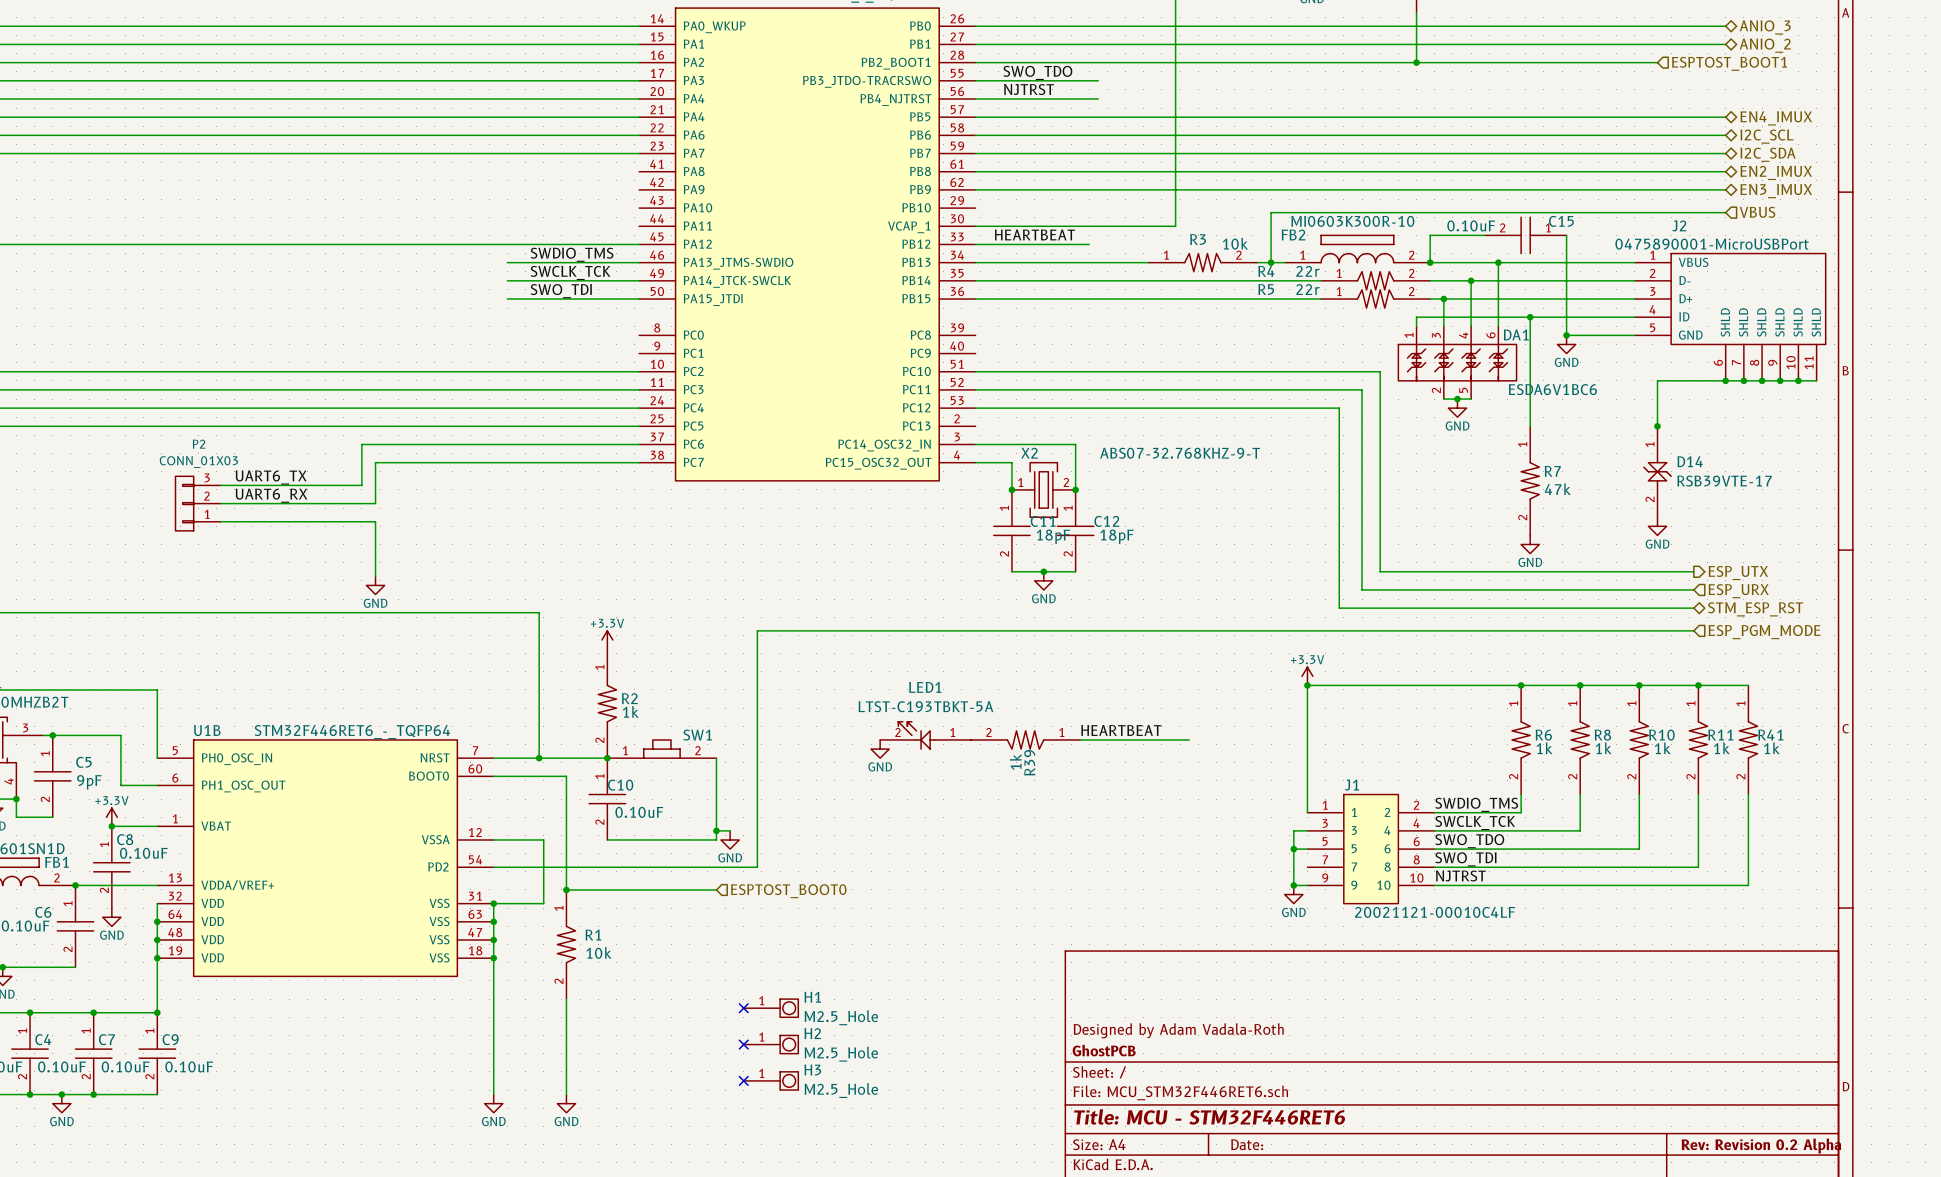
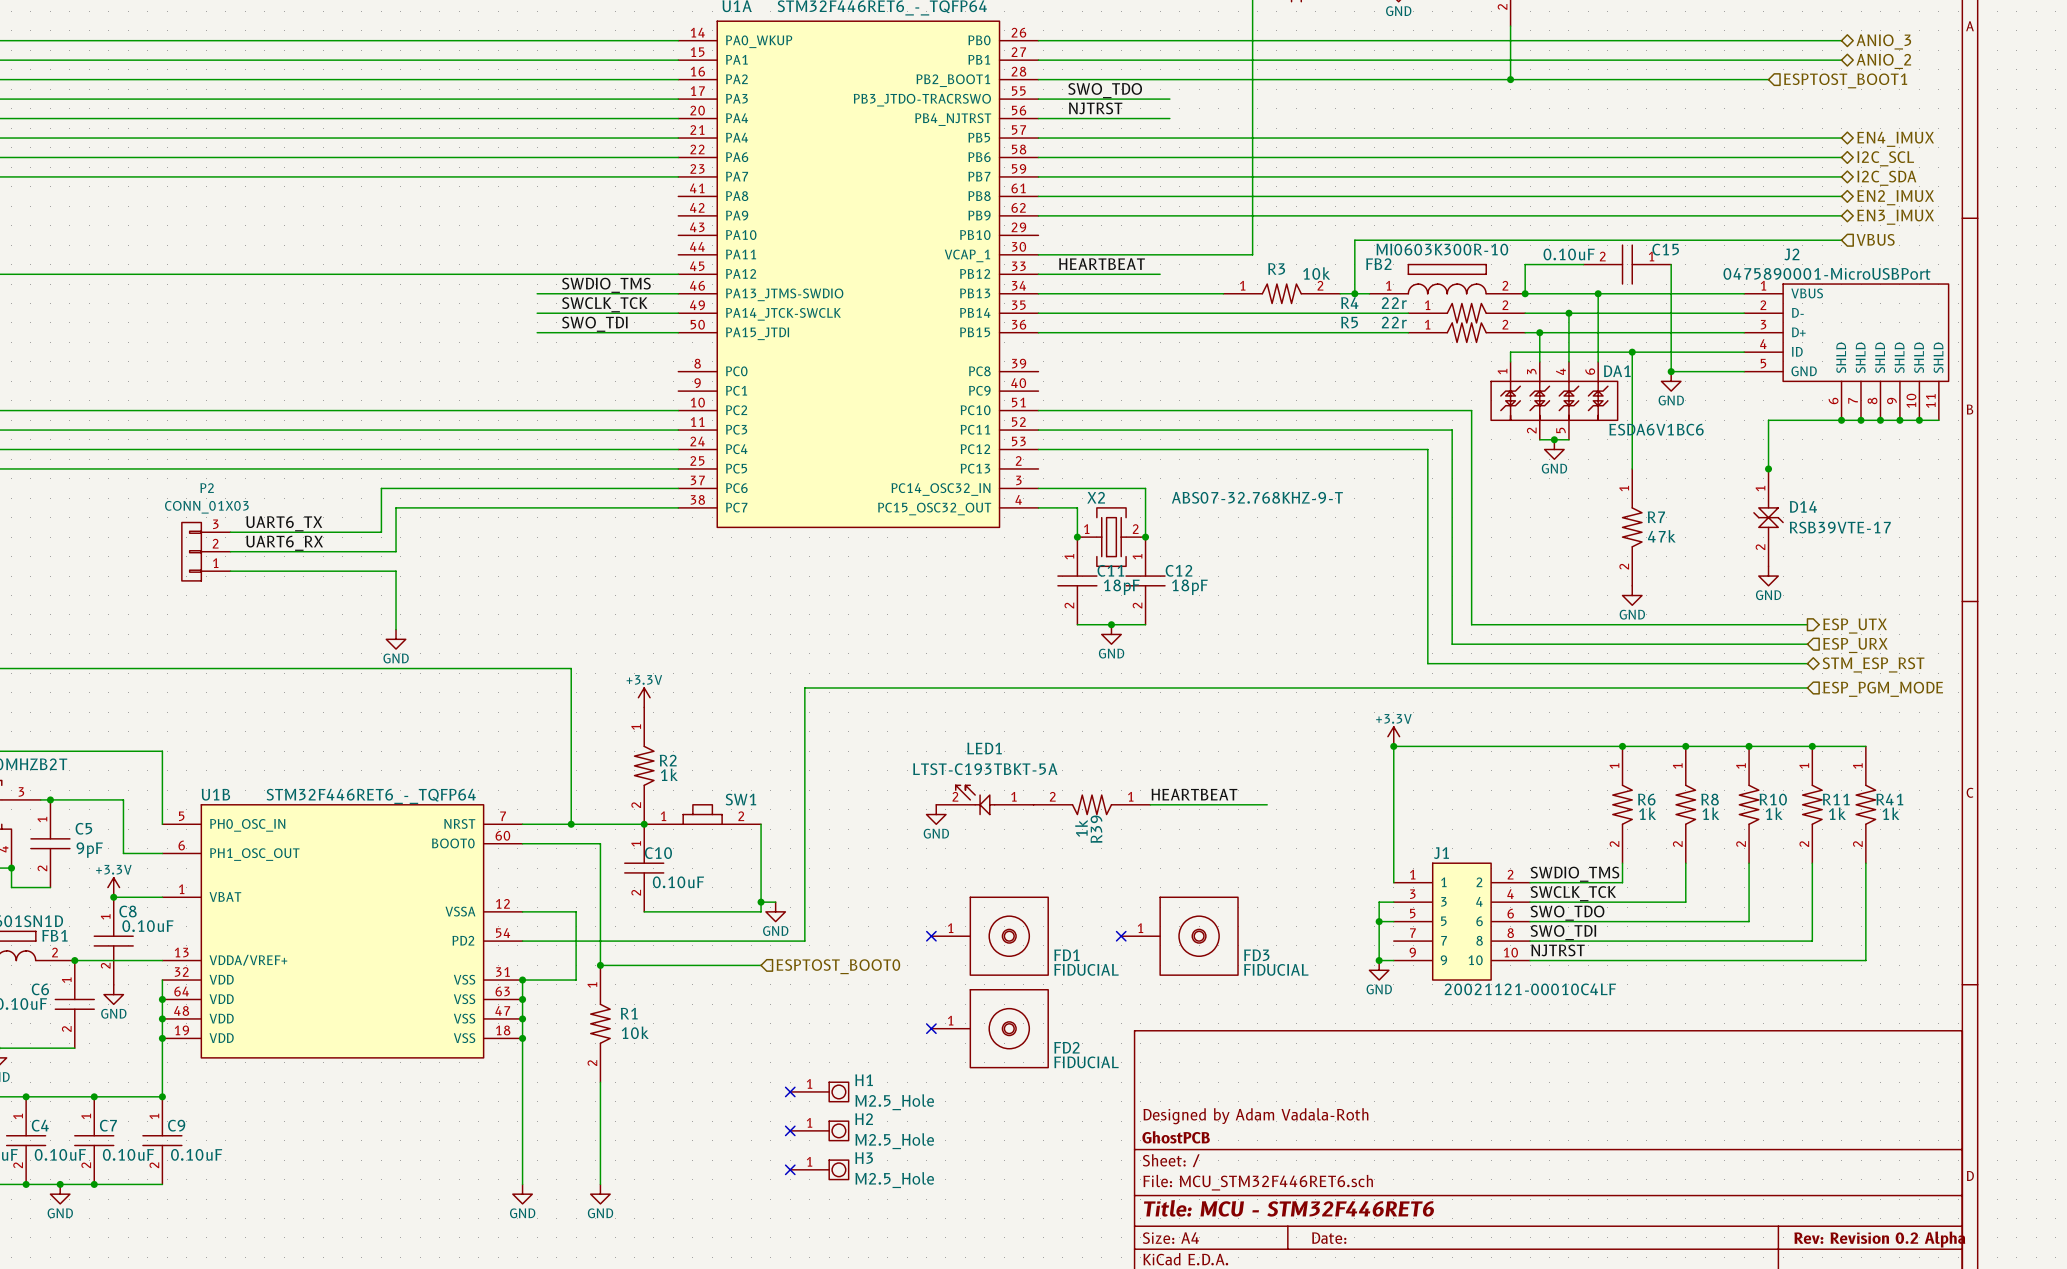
no-connect mark: none -> (931, 936)
FD1: none -> FIDUCIAL (989, 936)
no-connect mark: none -> (1121, 936)
FD3: none -> FIDUCIAL (1179, 936)
no-connect mark: none -> (931, 1028)
FD2: none -> FIDUCIAL (989, 1028)

